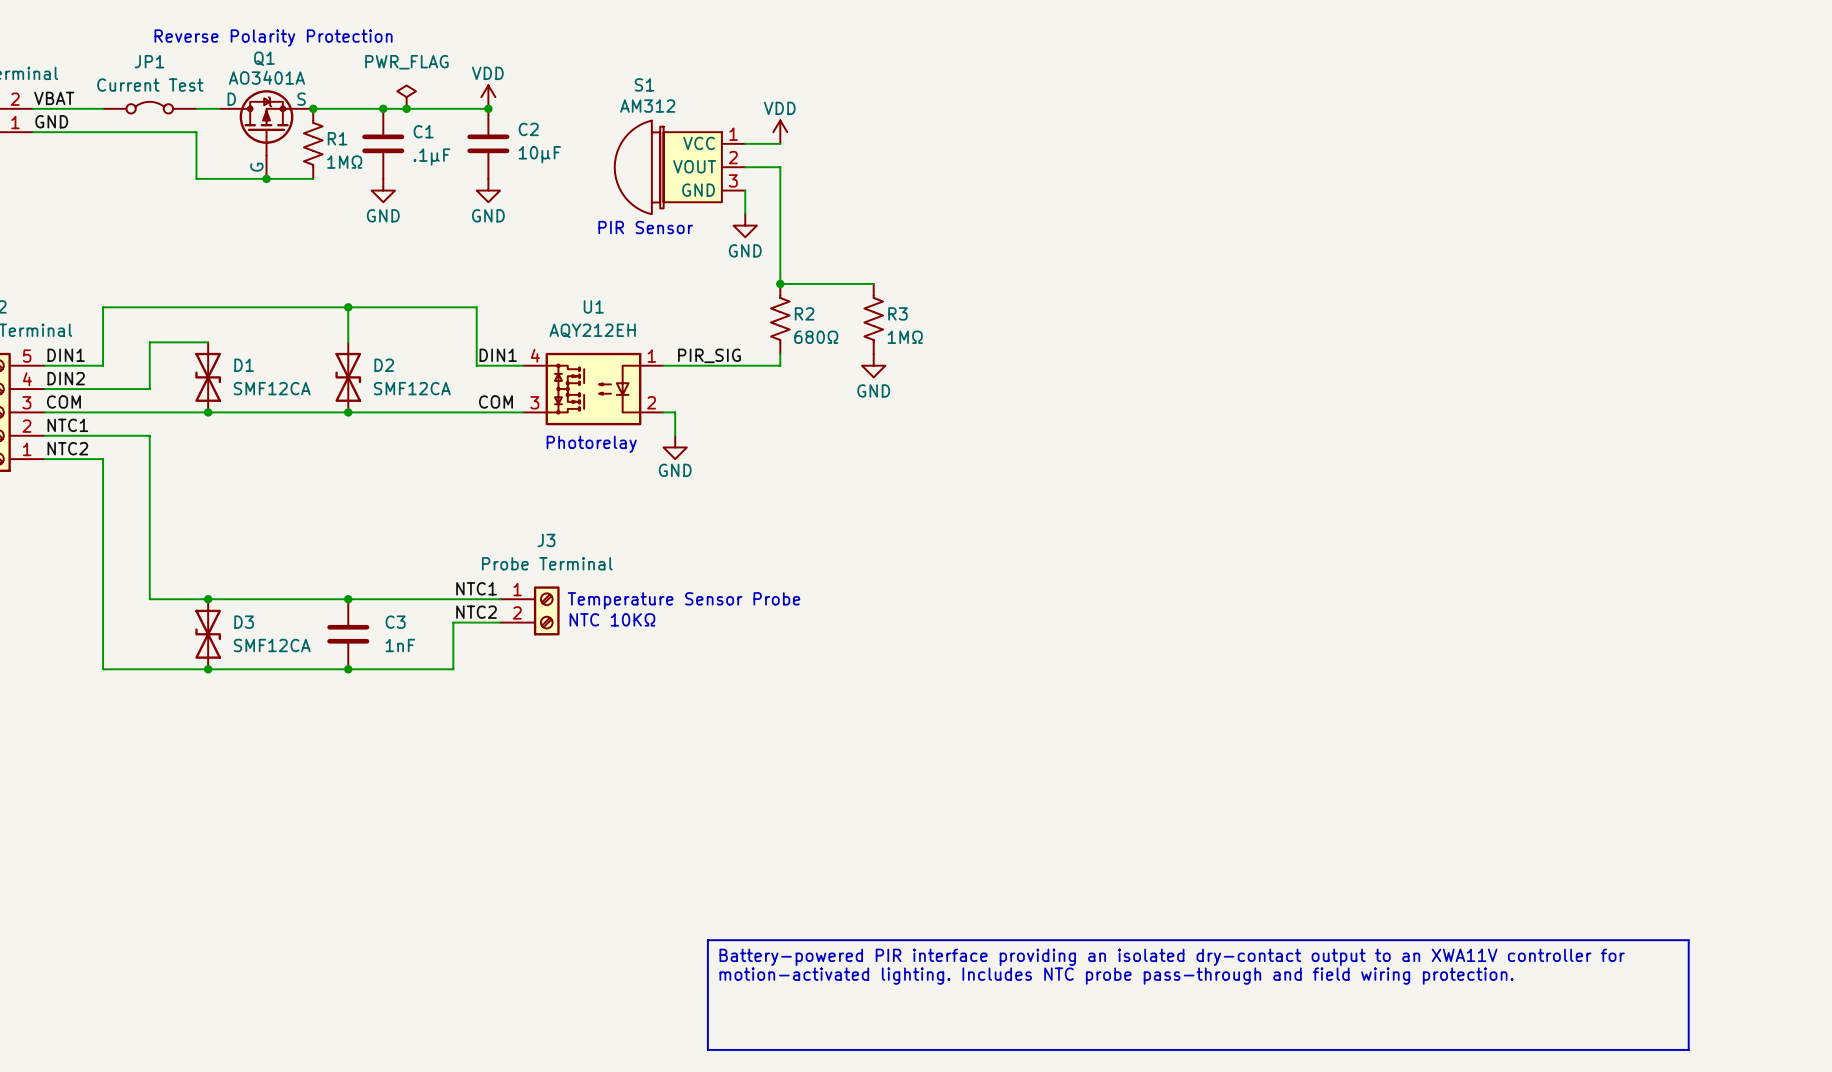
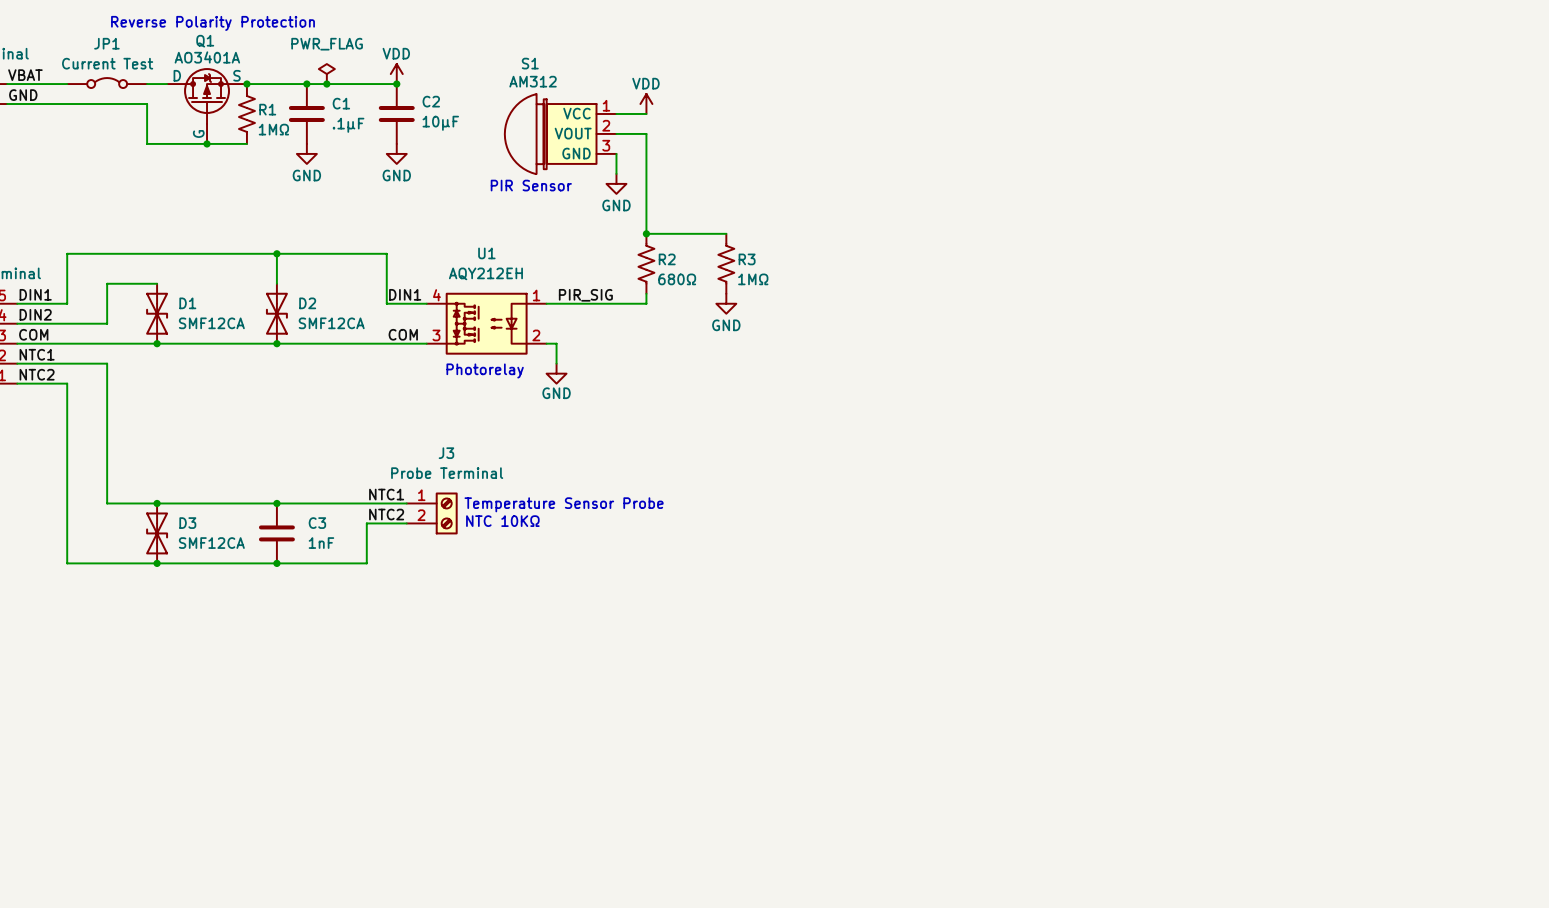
line: (707, 940) (1688, 940) (1688, 1049) (707, 1049) (707, 940) -> none
text: Battery-powered PIR interface providing an isolated dry-contact output to an XWA11V controller for (1172, 957) -> none
text: motion-activated lighting. Includes NTC probe pass-through and field wiring protection. (1116, 976) -> none

